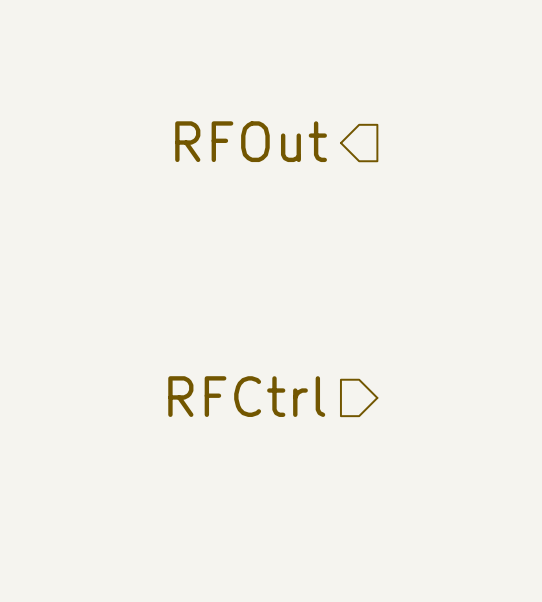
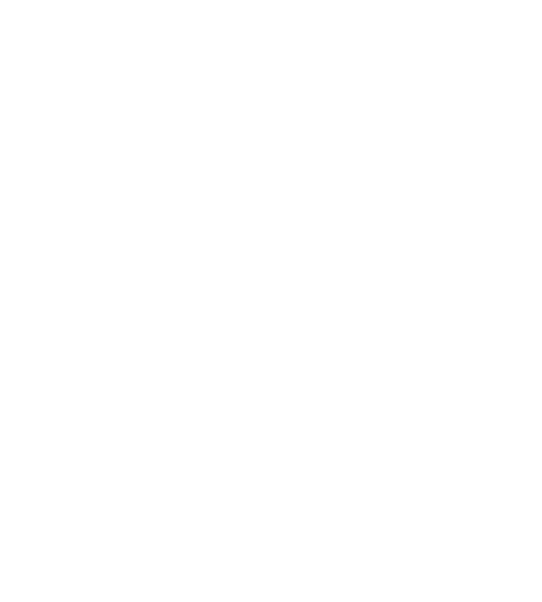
hierarchical label: RFOut (251, 141) -> none
hierarchical label: RFCtrl (246, 396) -> none

